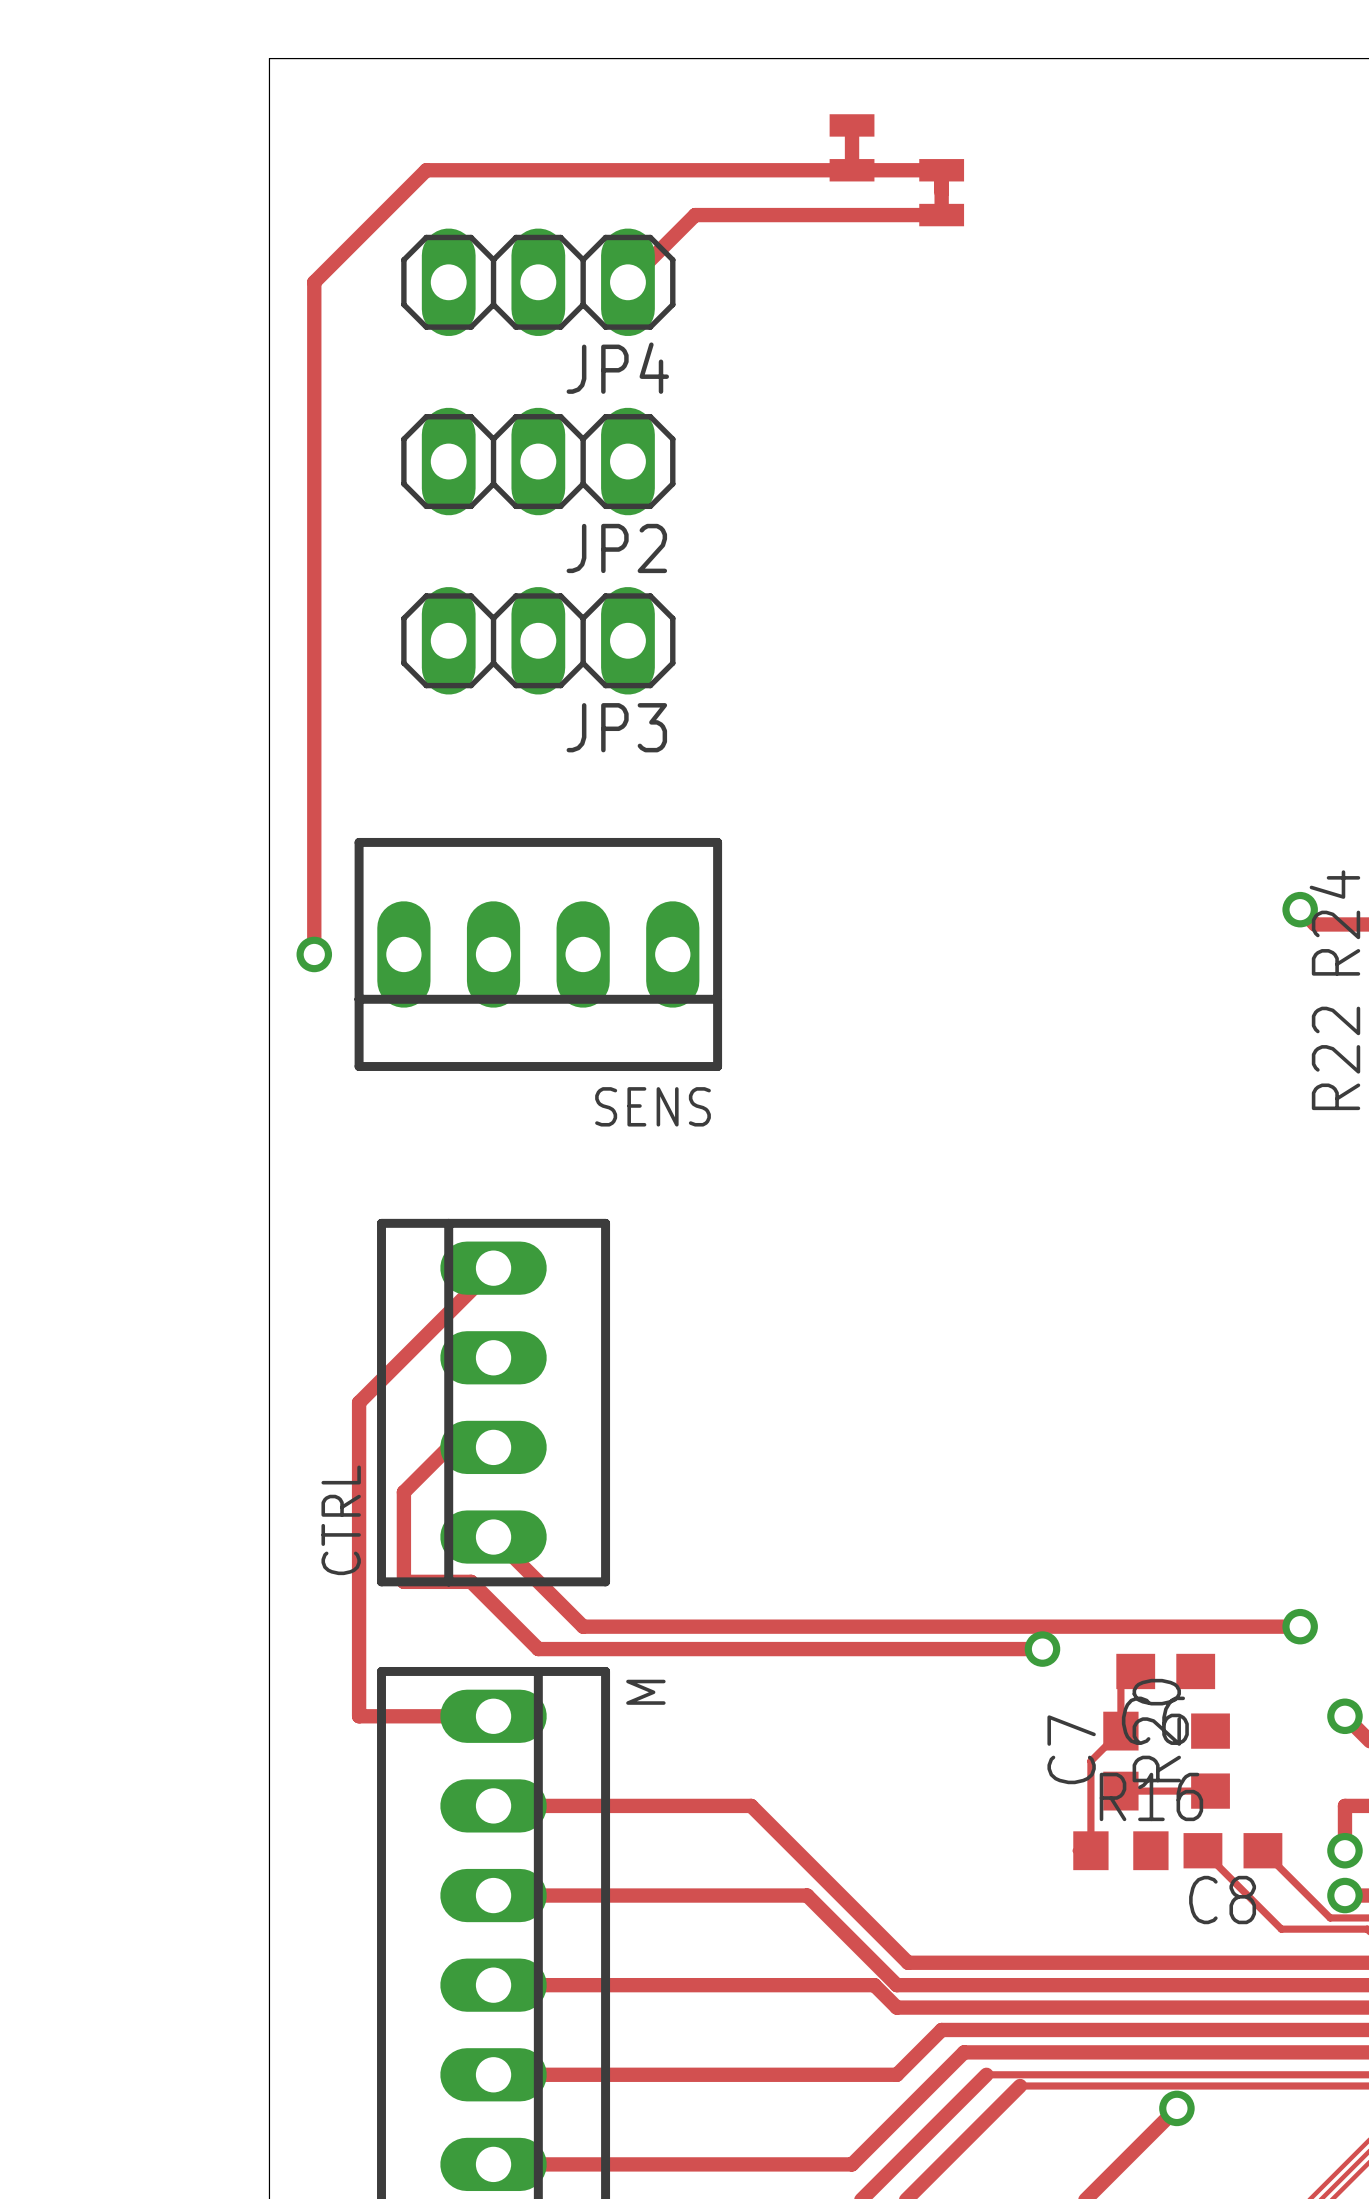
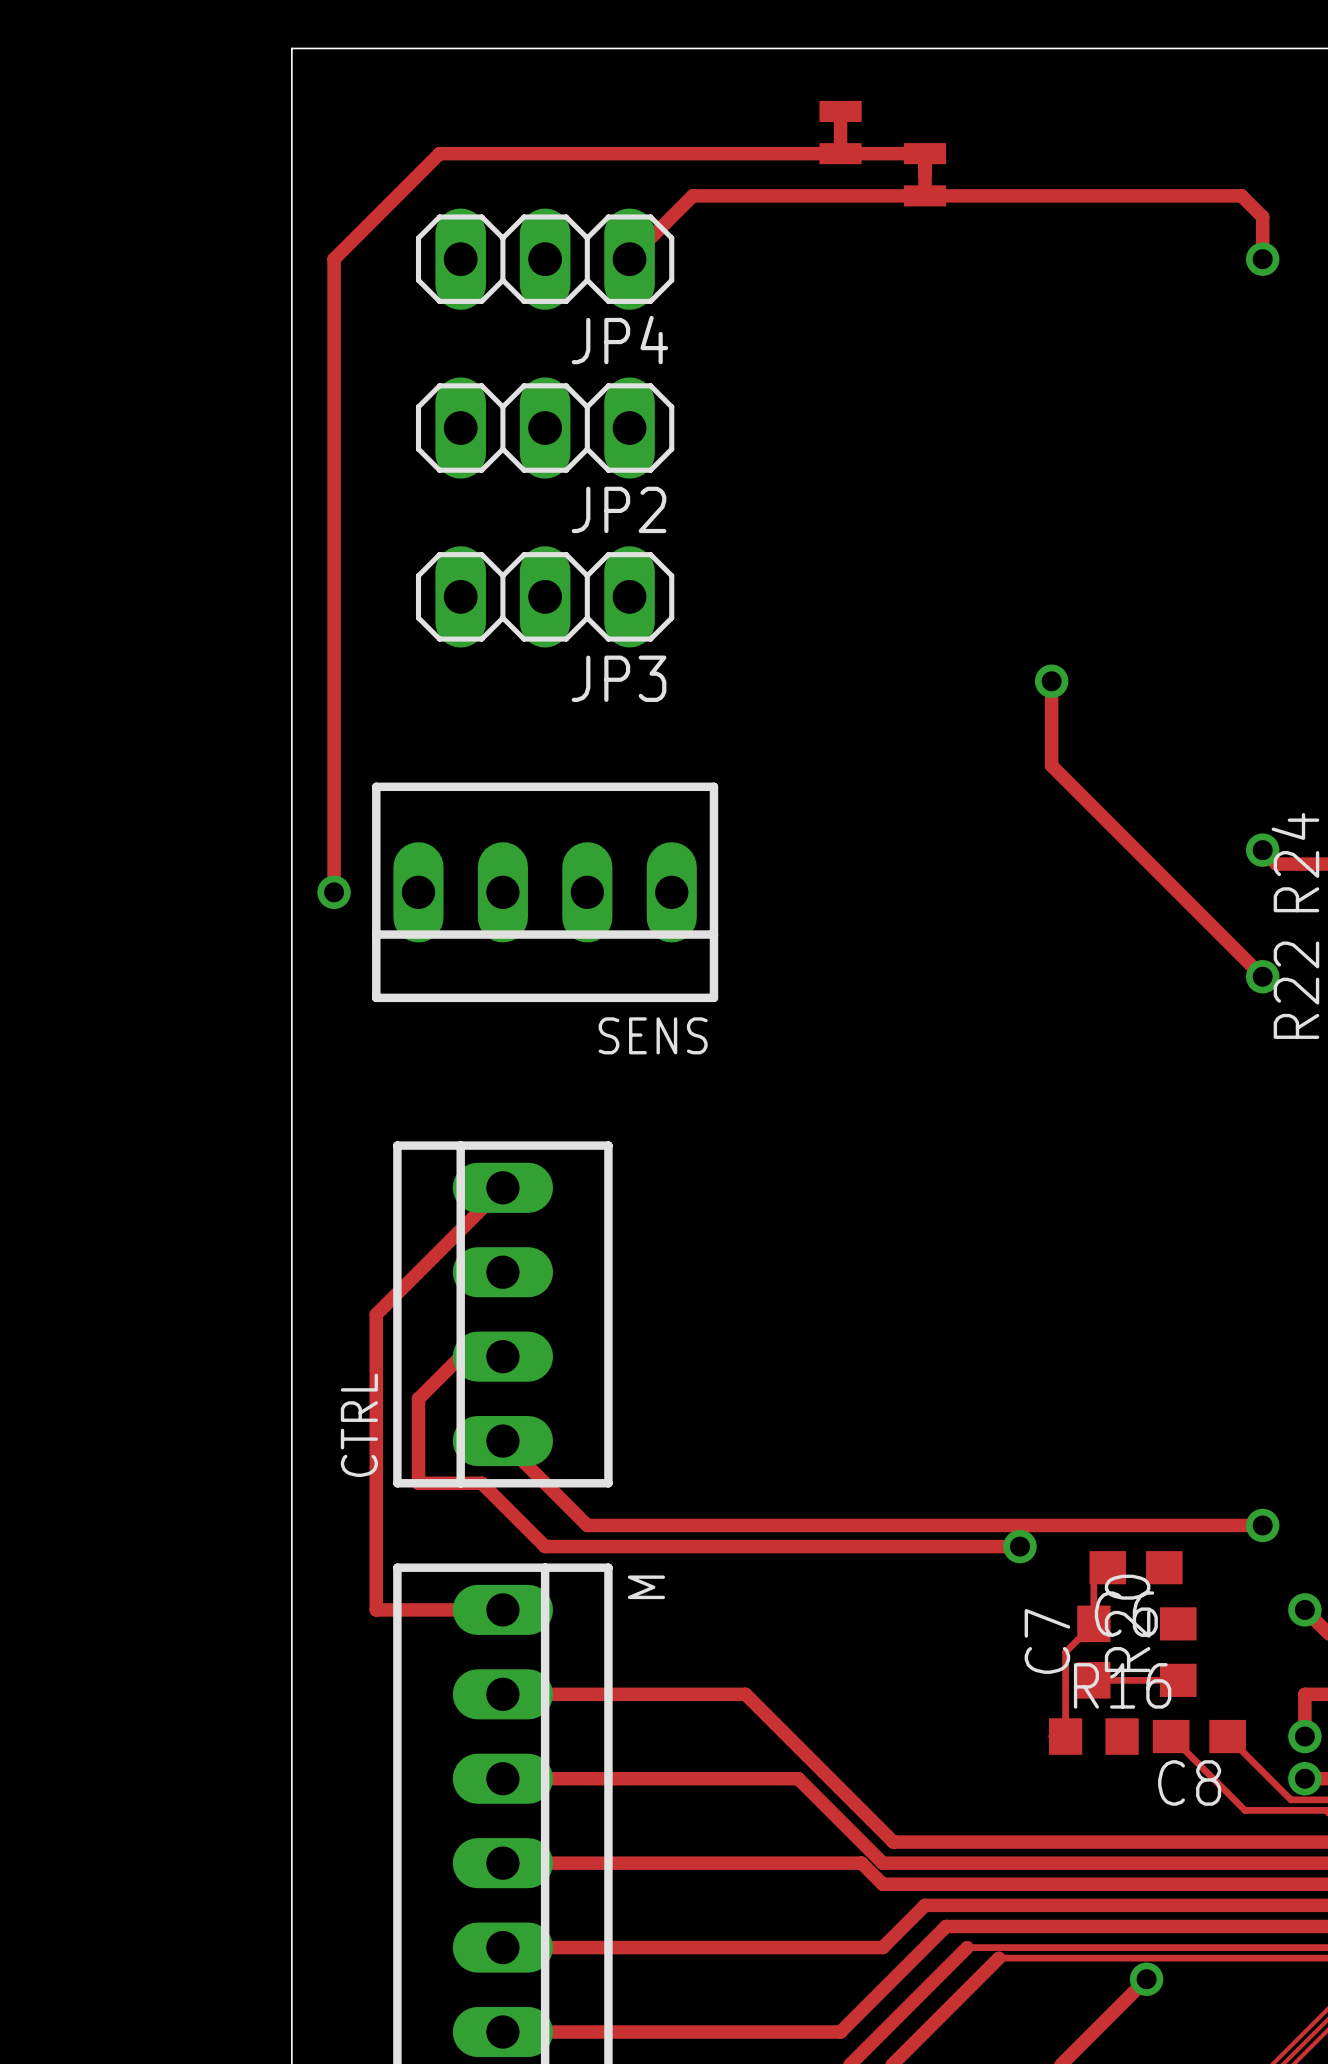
track: none -> (925, 195) (1241, 195) (1262, 216) (1262, 259)
via: none -> (1262, 259)
track: none -> (1051, 681) (1051, 765) (1262, 976)
via: none -> (1051, 681)
via: none -> (1262, 976)

